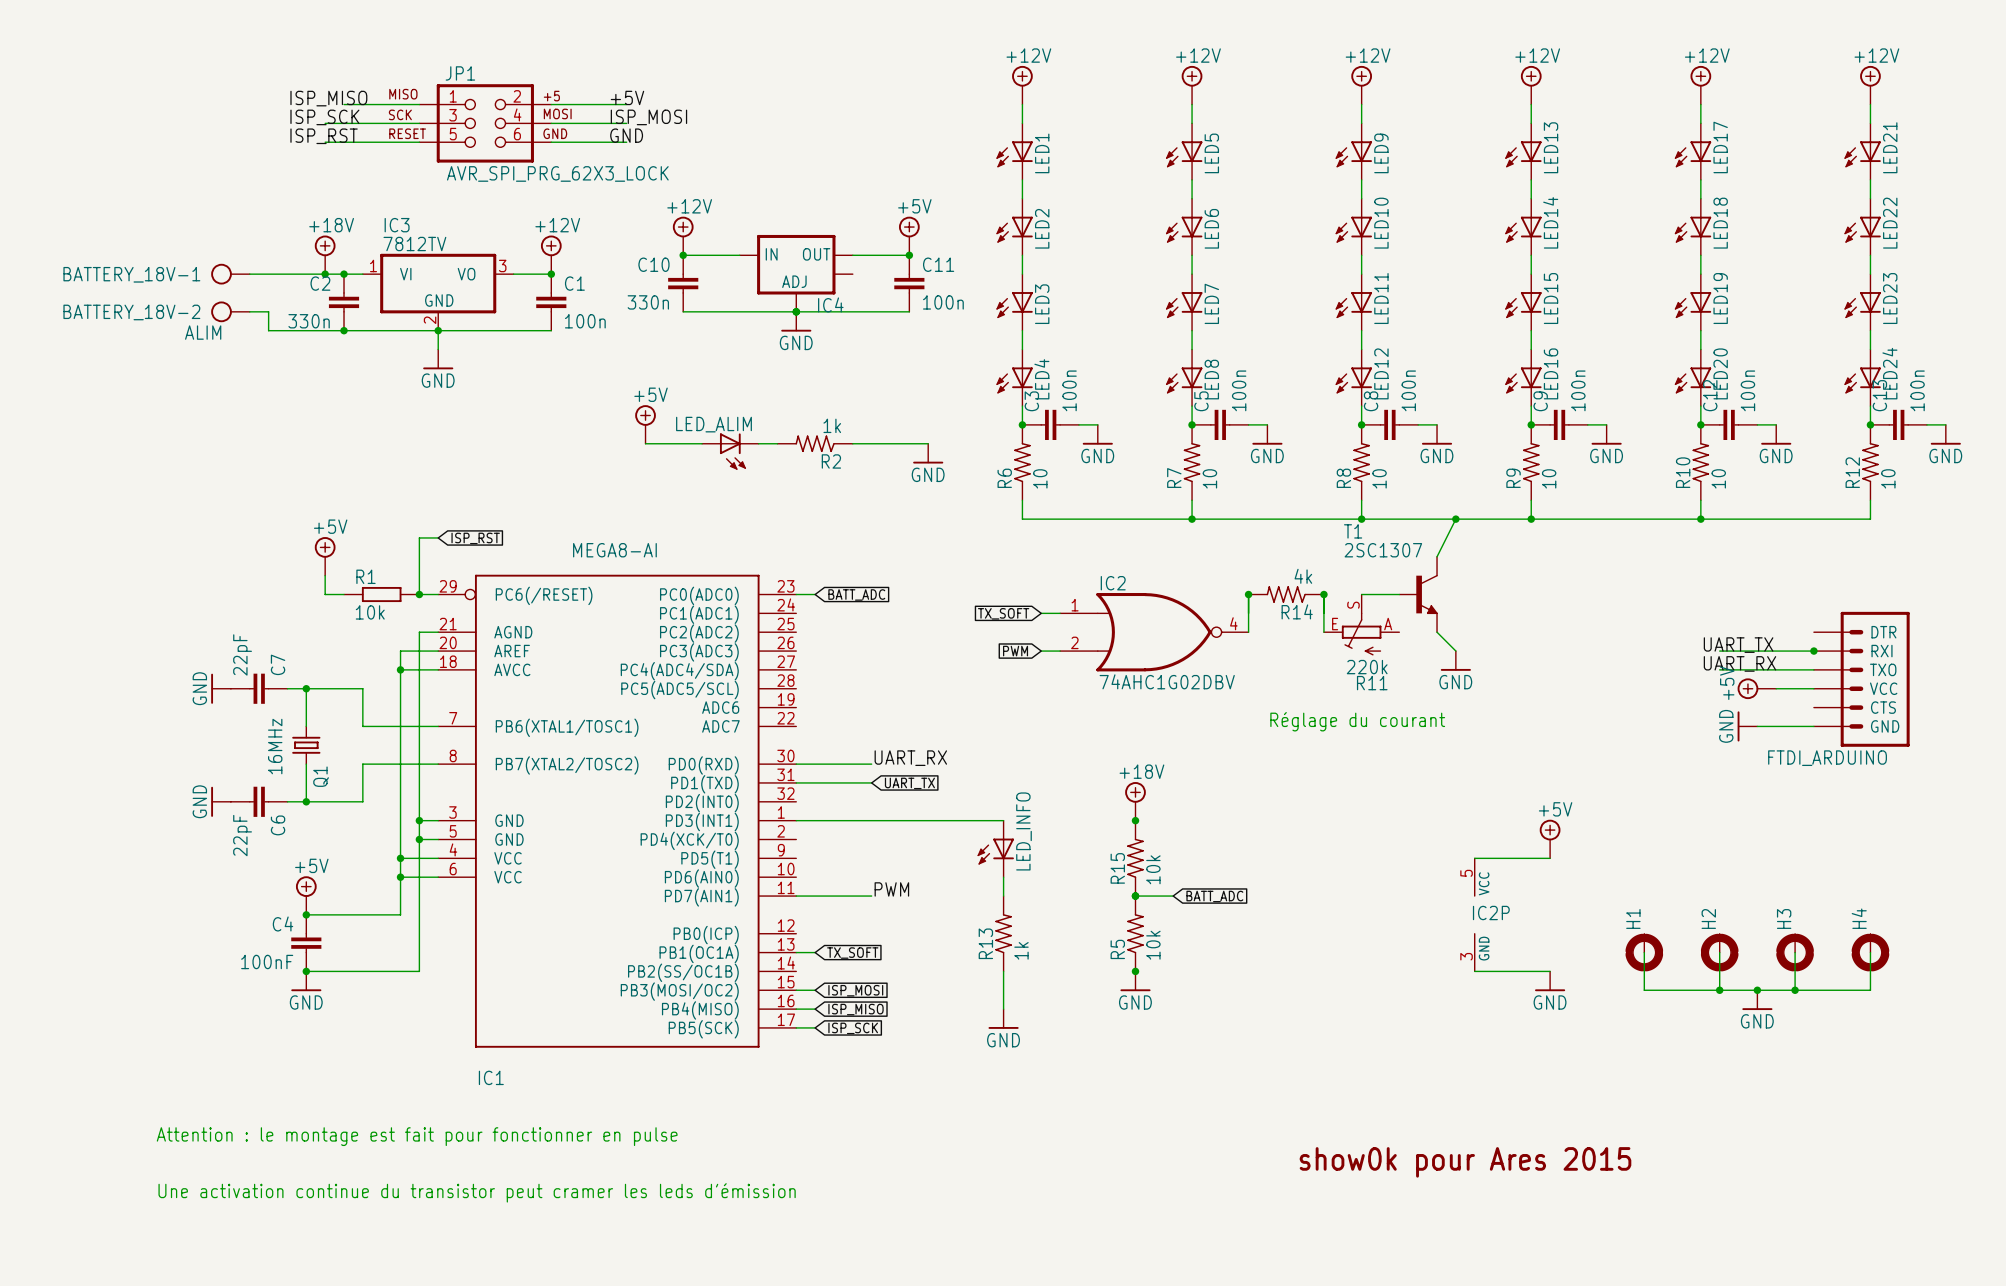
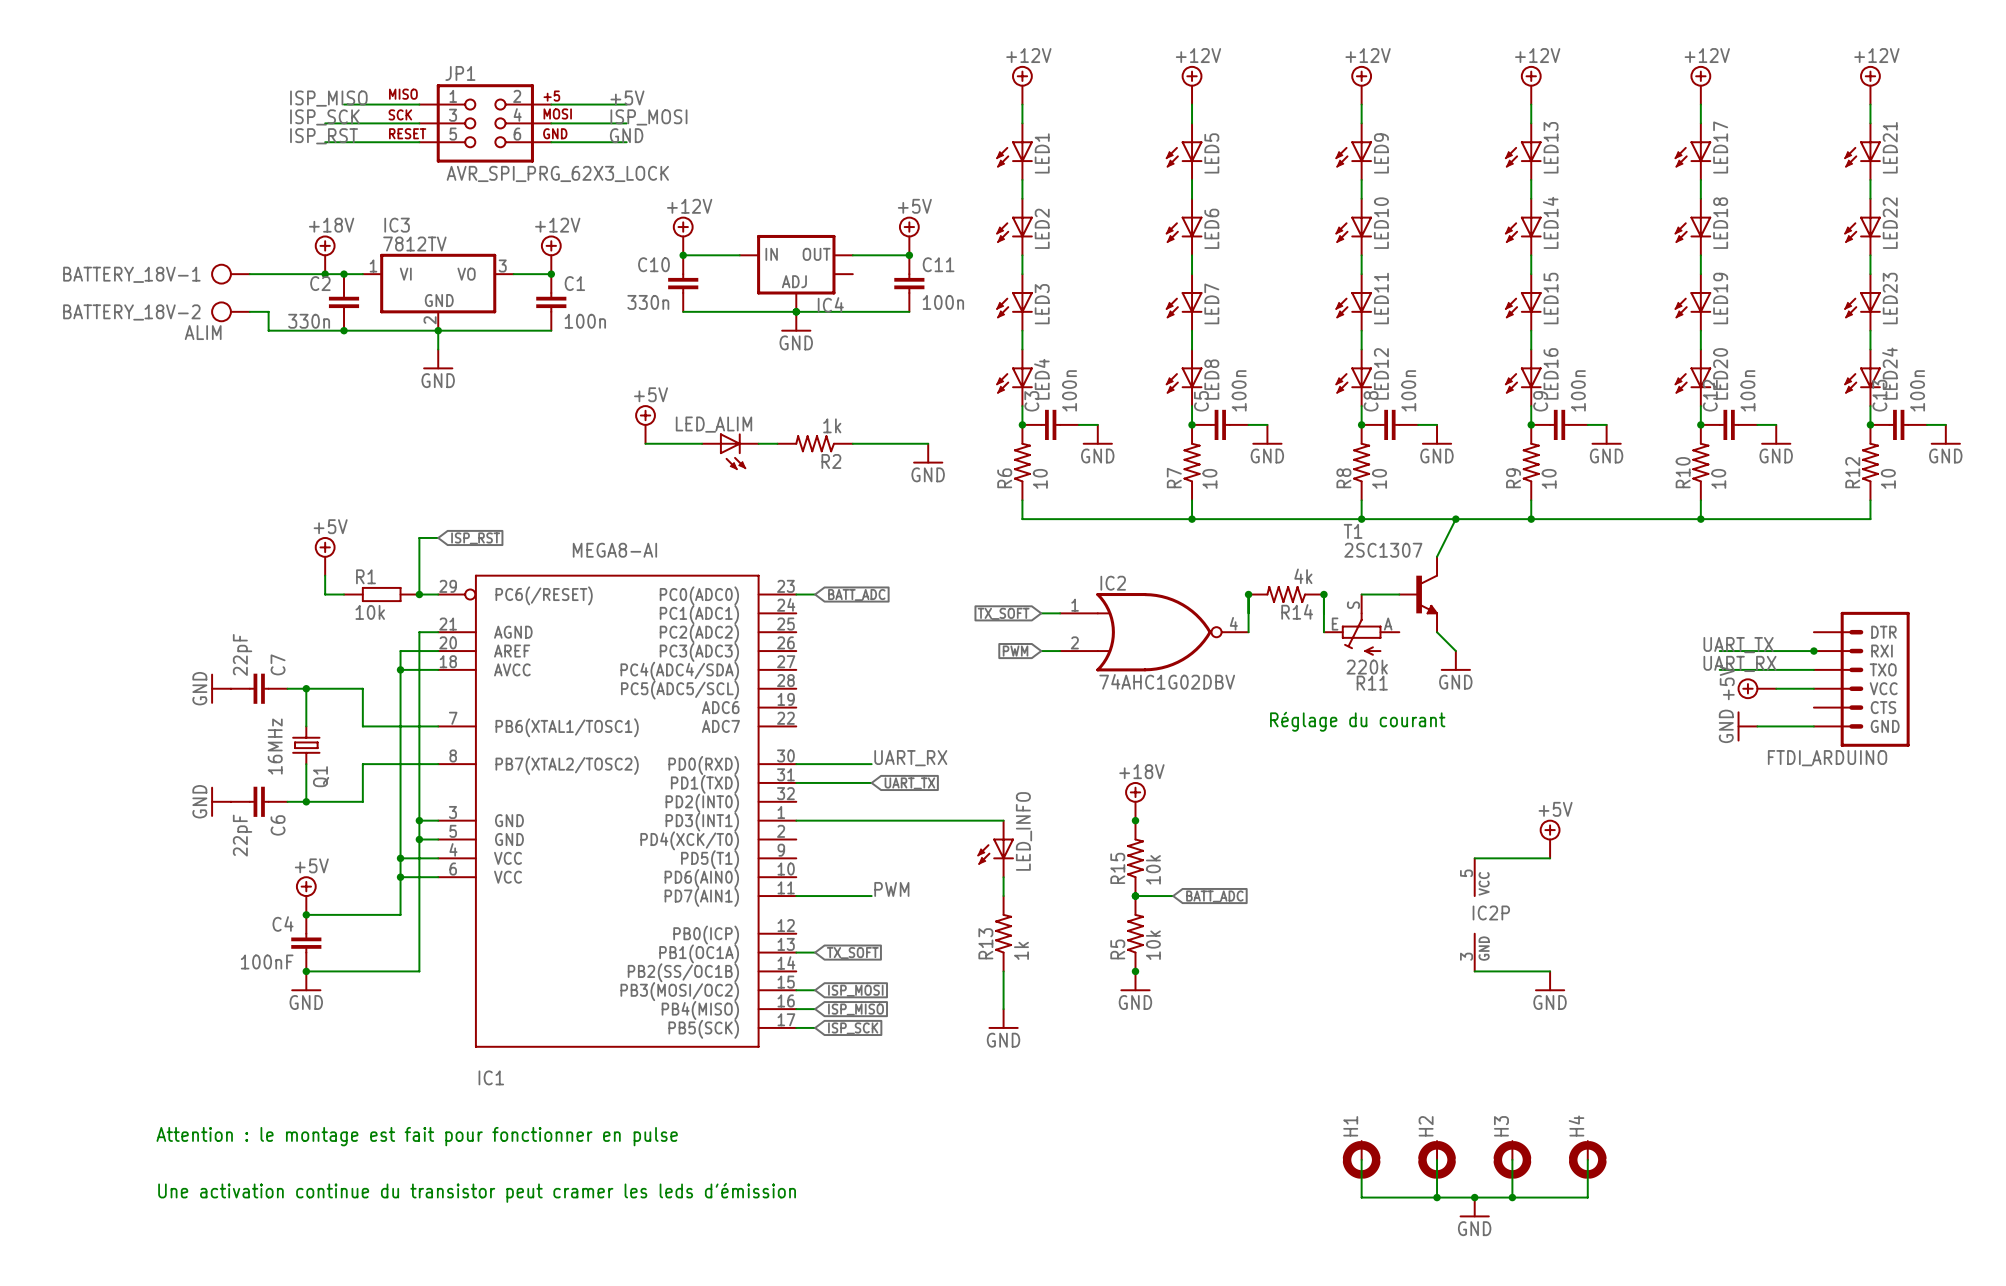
wire: (1644, 952) (1644, 990) (1870, 990) (1870, 952) -> none
H1 position: (1644, 952) -> (1361, 1159)
wire: (1719, 952) (1719, 990) -> none
H2 position: (1719, 952) -> (1437, 1159)
wire: (1795, 952) (1795, 990) -> none
H3 position: (1795, 952) -> (1512, 1159)
H4 position: (1870, 952) -> (1587, 1159)
junction: (1719, 990) -> none
junction: (1757, 990) -> none
junction: (1795, 990) -> none
power symbol: GND (1757, 1000) -> none
wire: none -> (1361, 1159) (1361, 1197) (1587, 1197) (1587, 1159)
wire: none -> (1437, 1159) (1437, 1197)
wire: none -> (1512, 1159) (1512, 1197)
text: show0k pour Ares 2015 (1465, 1162) -> none
junction: none -> (1437, 1197)
junction: none -> (1474, 1197)
junction: none -> (1512, 1197)
power symbol: none -> GND (1474, 1207)

